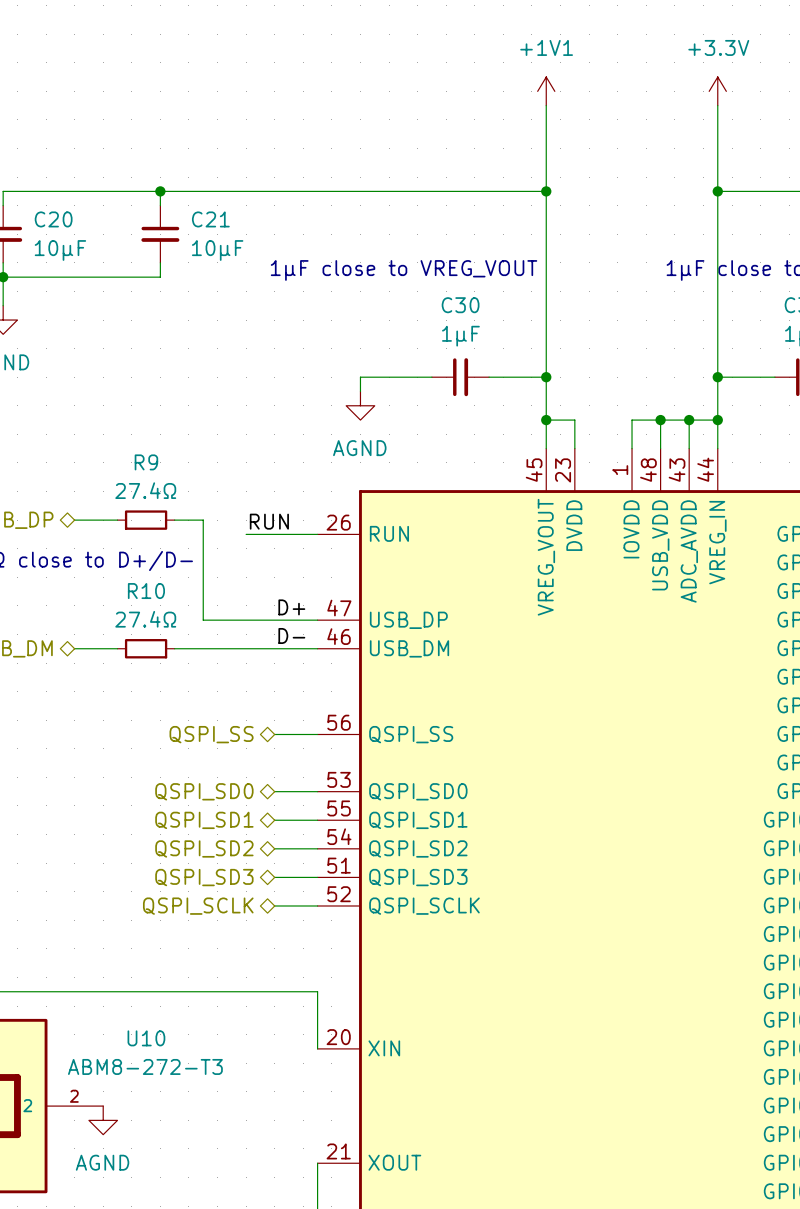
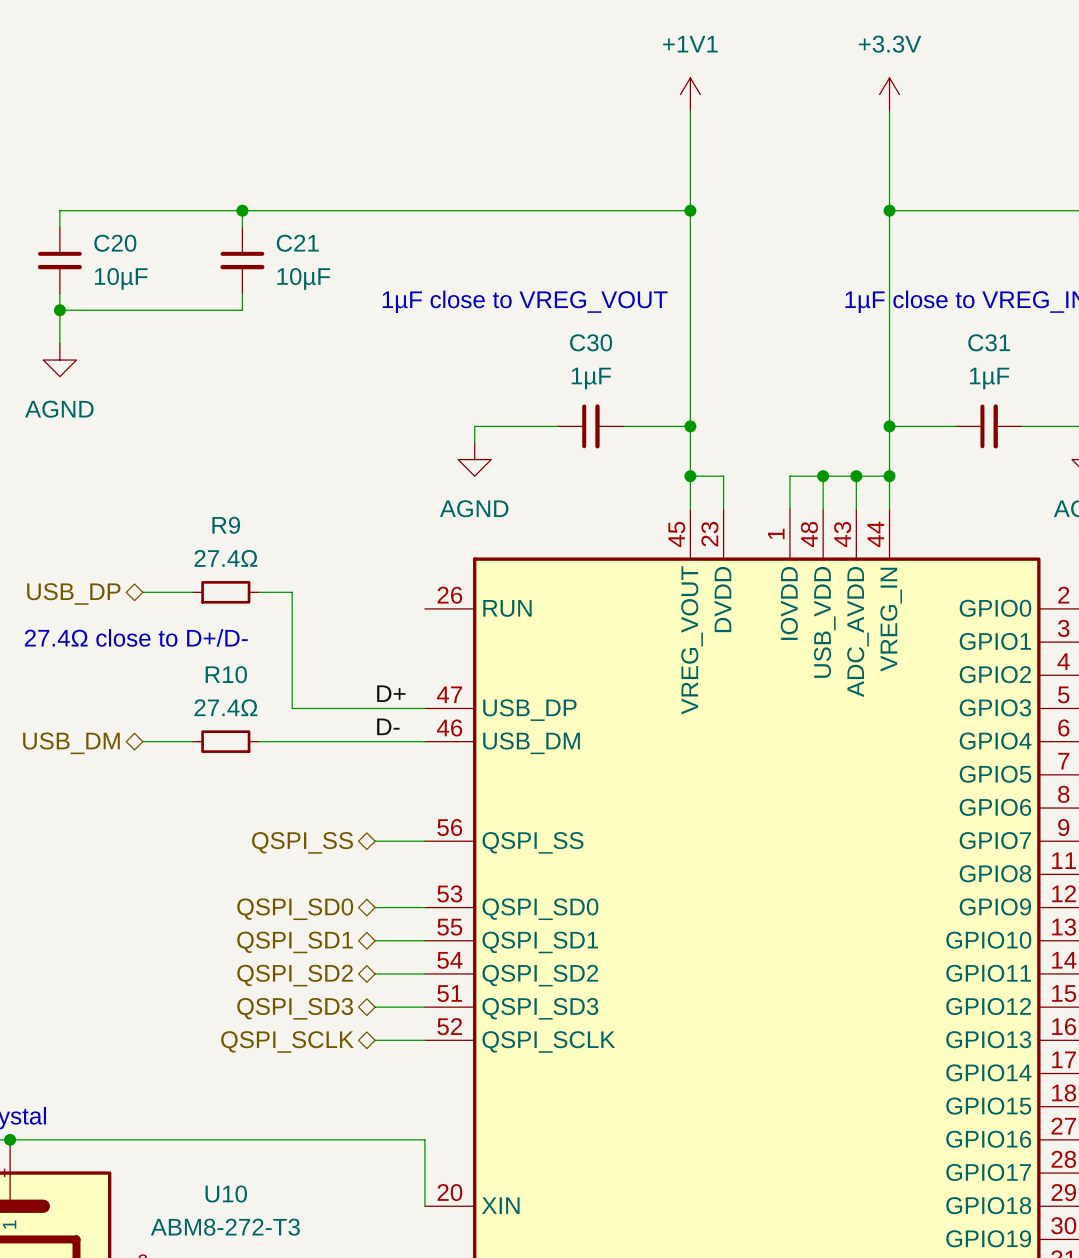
label: RUN (269, 521) -> none
wire: (246, 534) (317, 534) -> none

